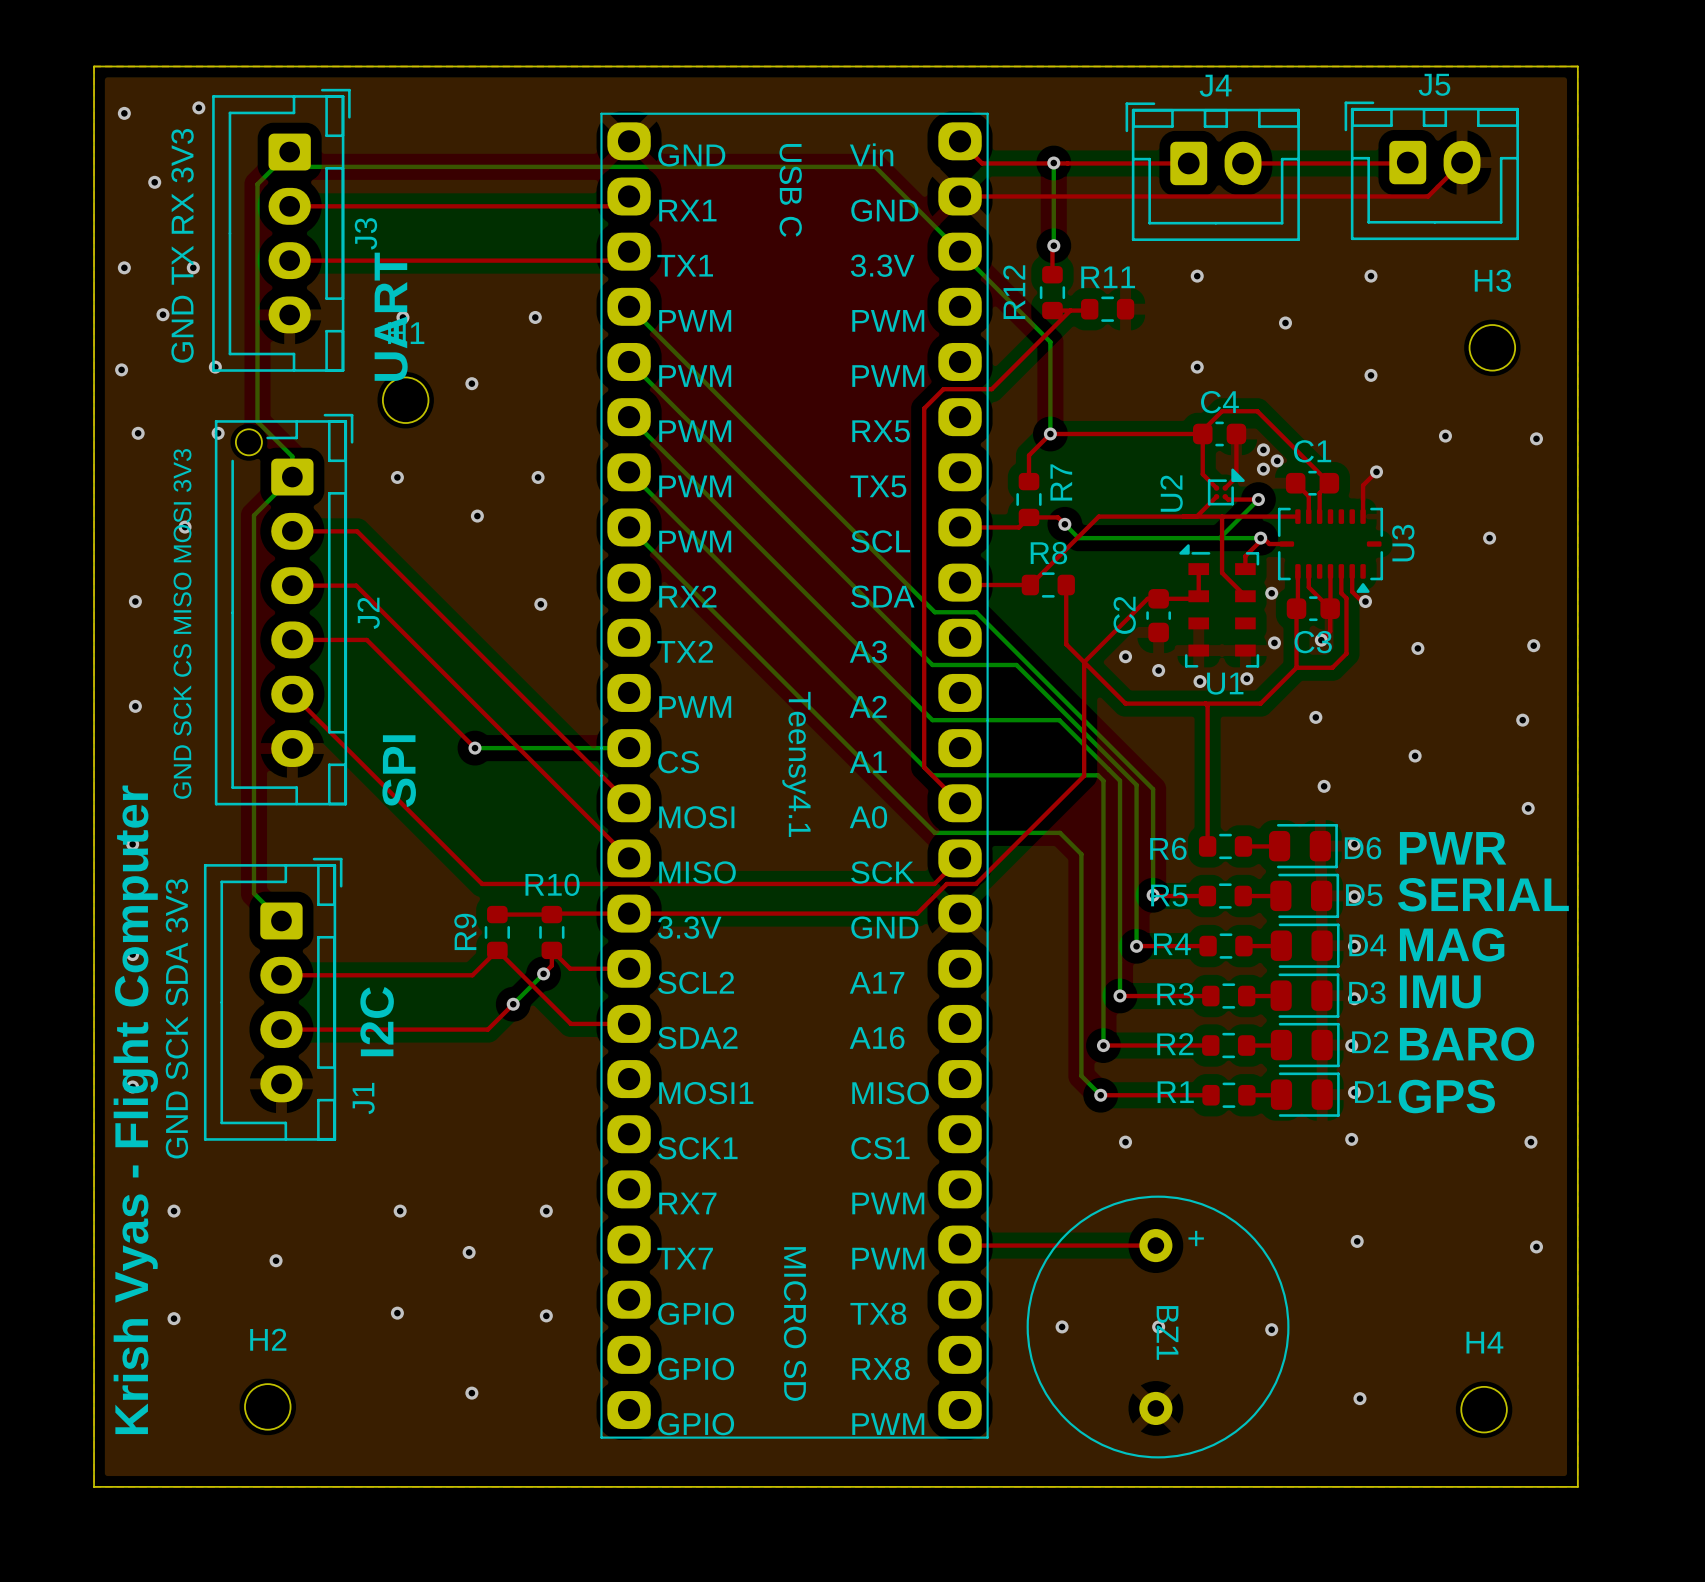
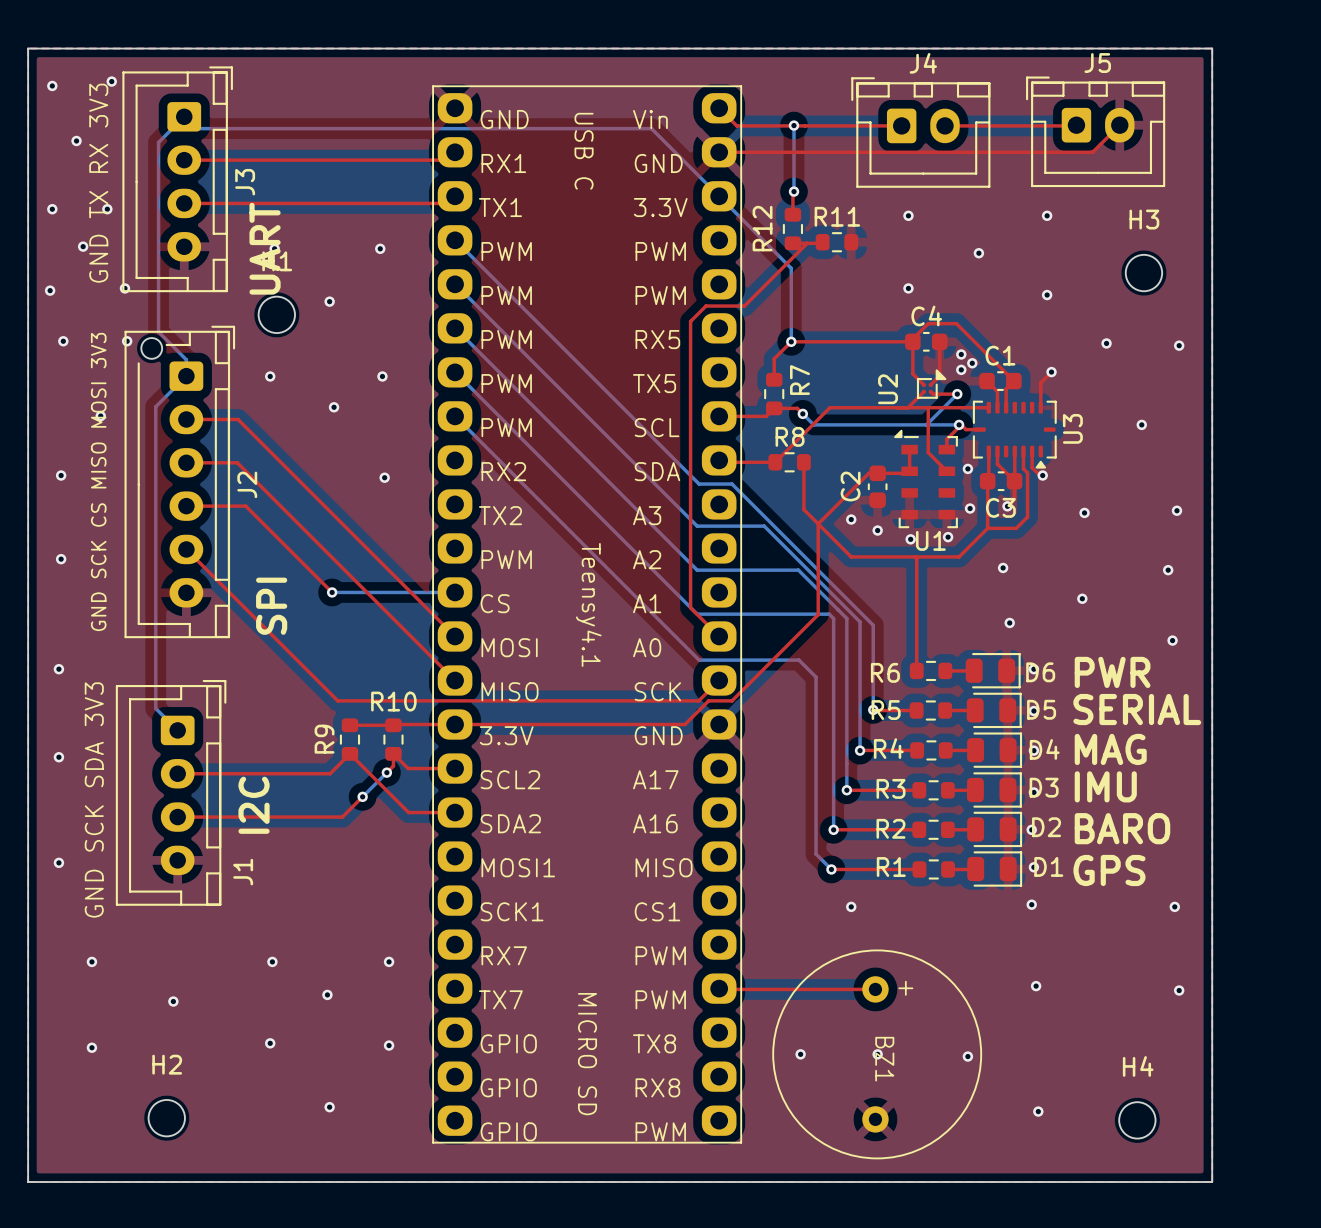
text: Krish Vyas - Flight Computer (135, 1109) -> none

